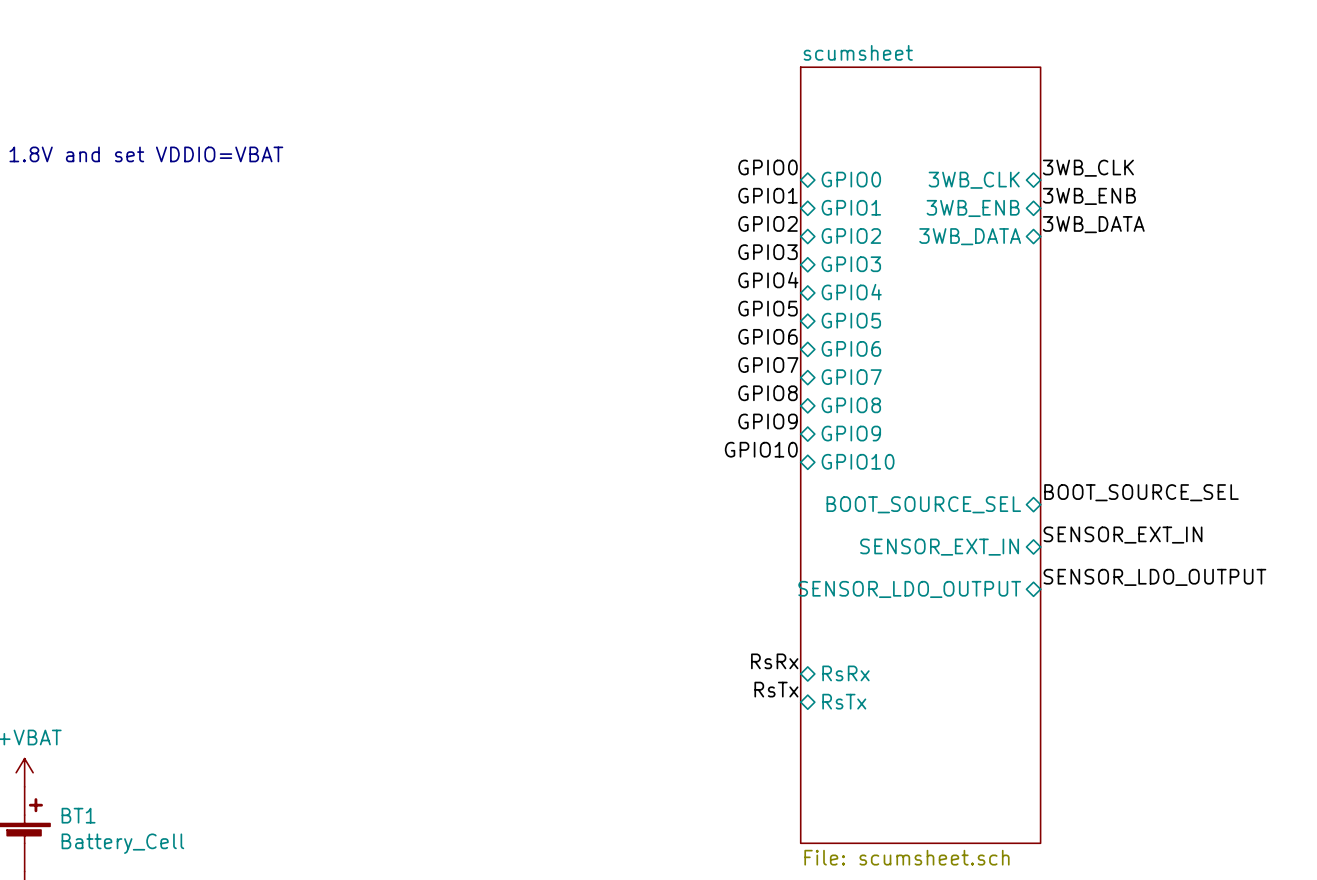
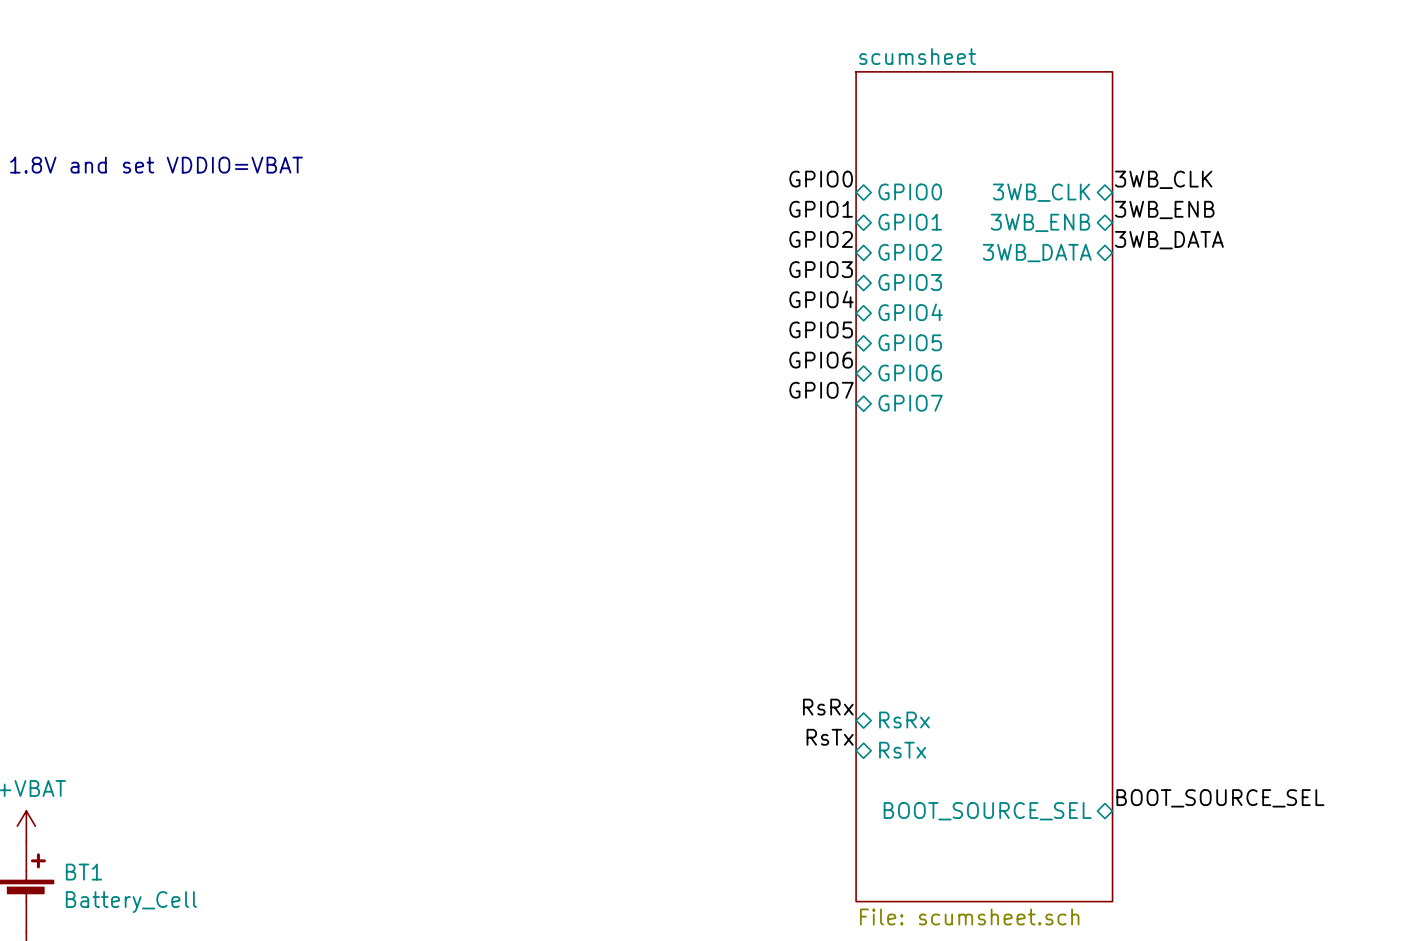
label: GPIO8 (768, 393) -> none
sheet pin: GPIO8 (851, 405) -> none
label: GPIO9 (768, 421) -> none
sheet pin: GPIO9 (851, 433) -> none
label: GPIO10 (761, 449) -> none
sheet pin: GPIO10 (858, 461) -> none
label position: BOOT_SOURCE_SEL (1141, 492) -> BOOT_SOURCE_SEL (1220, 798)
sheet pin position: BOOT_SOURCE_SEL (923, 504) -> BOOT_SOURCE_SEL (987, 811)
label: SENSOR_EXT_IN (1123, 535) -> none
sheet pin: SENSOR_EXT_IN (939, 547) -> none
label: SENSOR_LDO_OUTPUT (1154, 577) -> none
sheet pin: SENSOR_LDO_OUTPUT (909, 589) -> none

